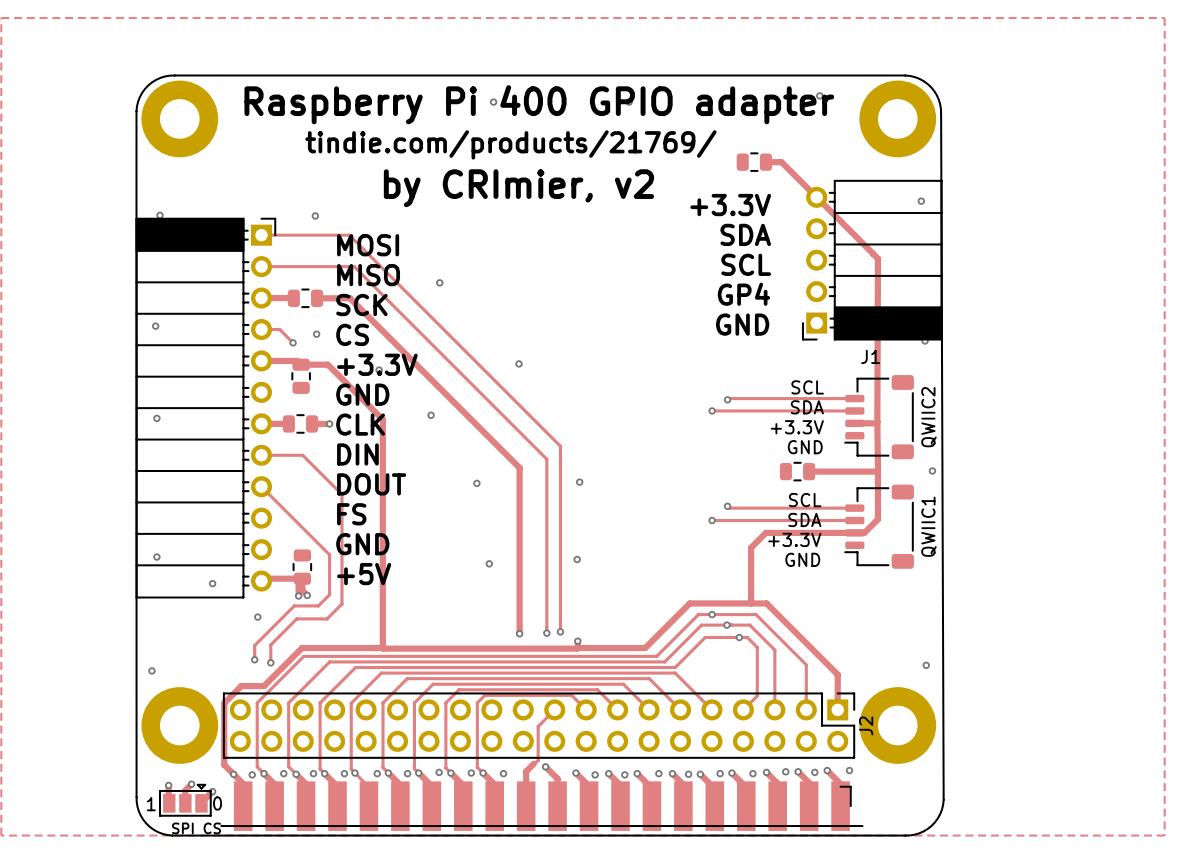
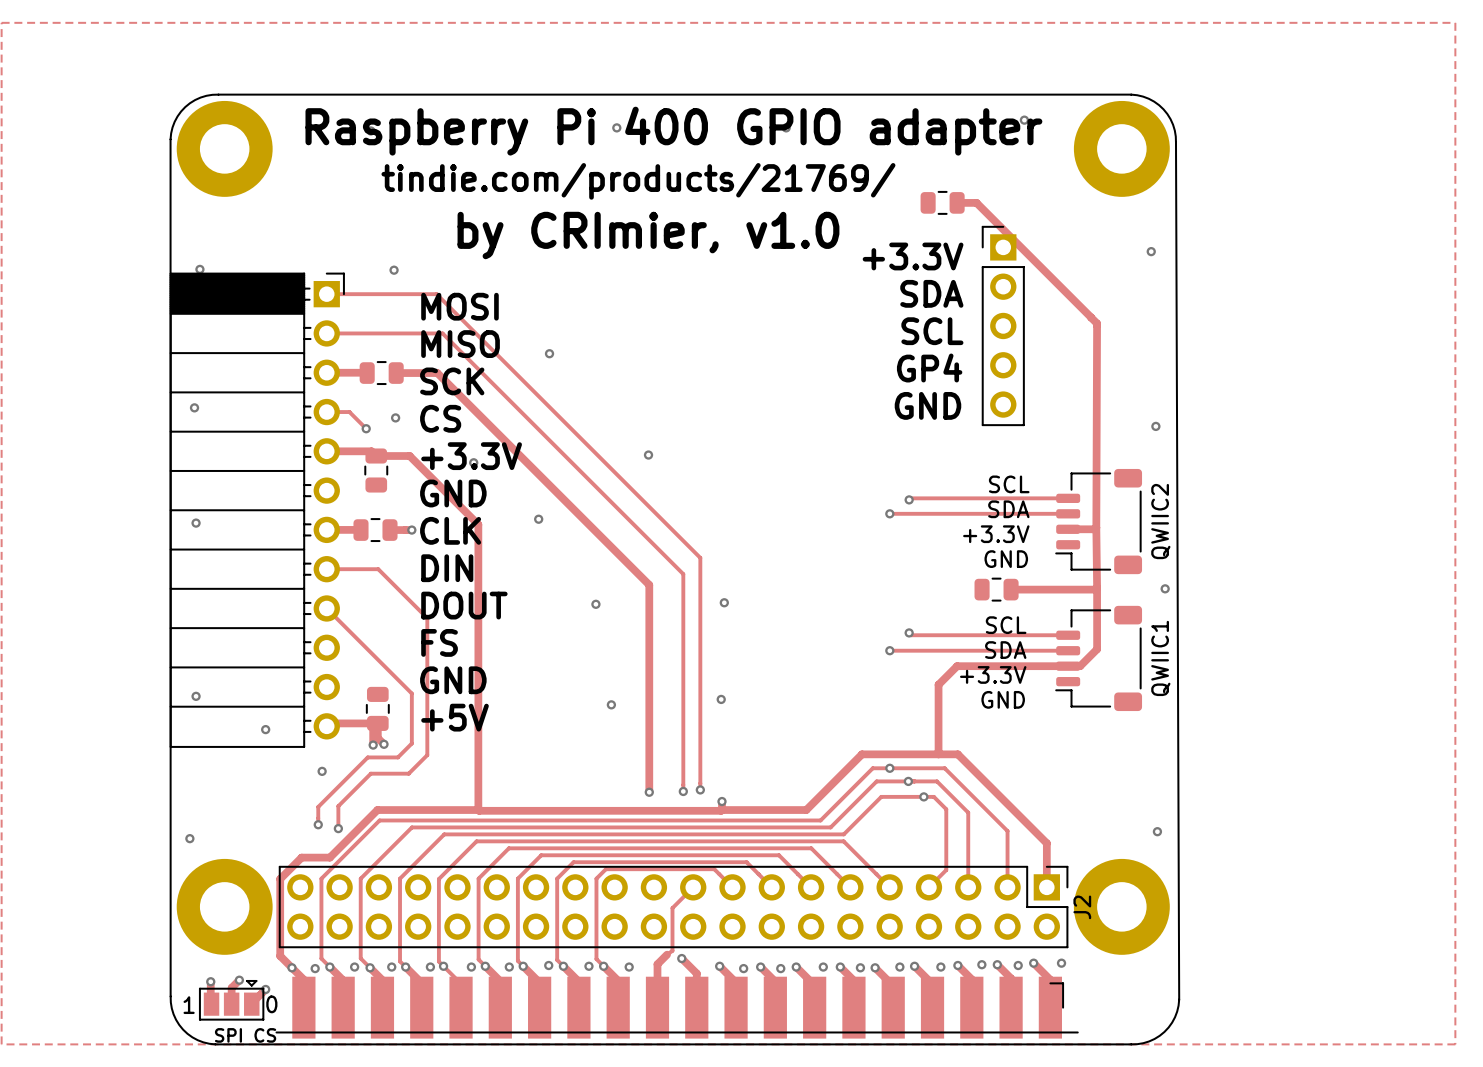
text: by CRImier, v2 (518, 188) -> by CRImier, v1.0 (648, 235)
part: none -> (1003, 325)
J1: (872, 260) -> none

